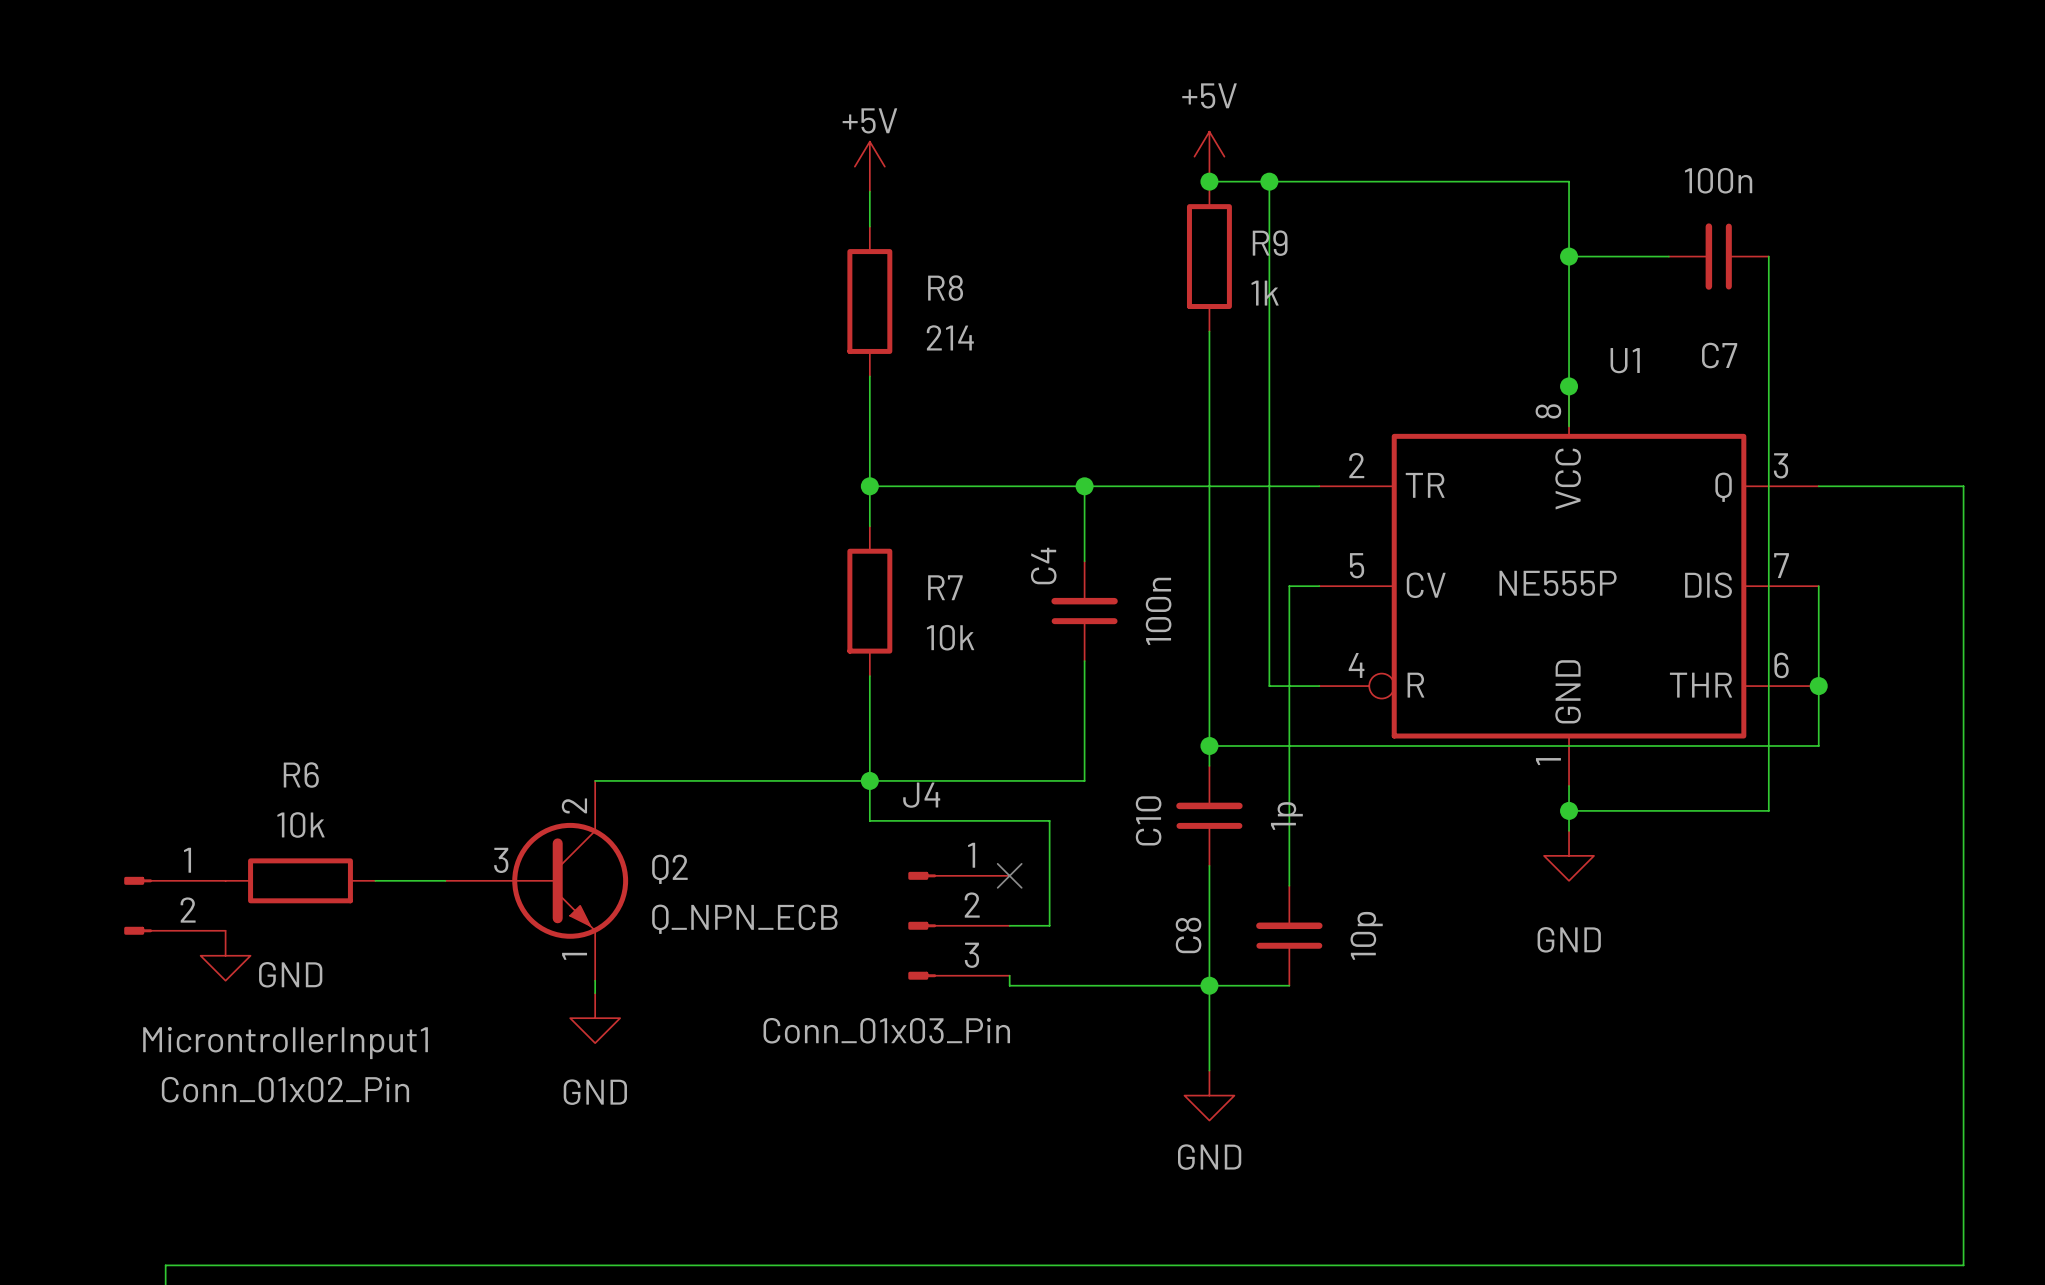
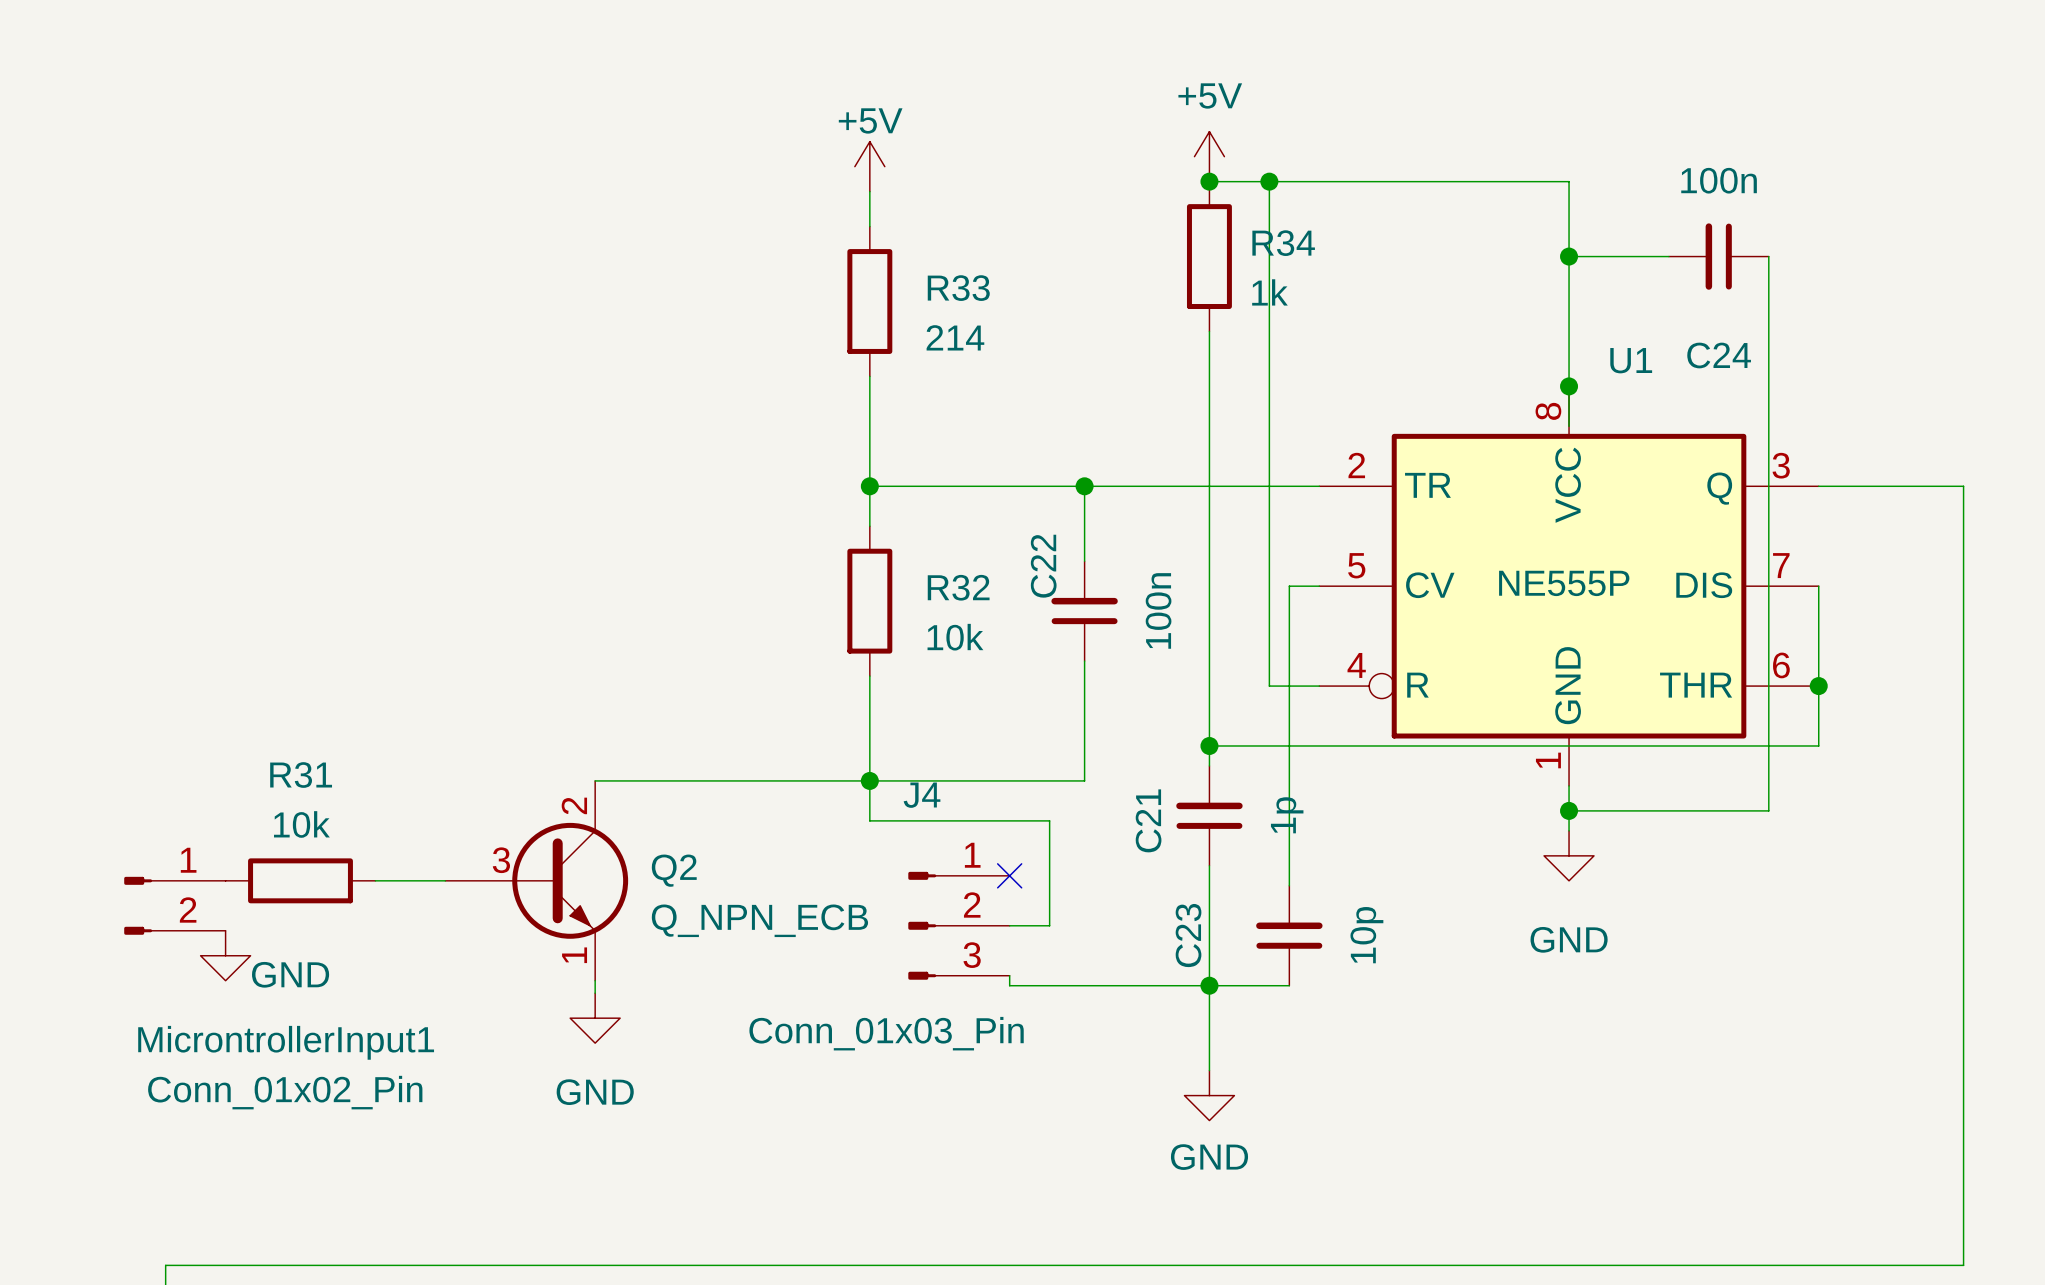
R9 name: R9 (1270, 243) -> R34 (1283, 243)
R8 name: R8 (945, 288) -> R33 (958, 288)
C7 name: C7 (1719, 355) -> C24 (1719, 355)
C4 name: C4 (1043, 566) -> C22 (1043, 566)
R7 name: R7 (945, 587) -> R32 (958, 587)
R6 name: R6 (301, 775) -> R31 (301, 775)
C10 name: C10 (1148, 820) -> C21 (1148, 820)
C8 name: C8 (1188, 935) -> C23 (1188, 935)

